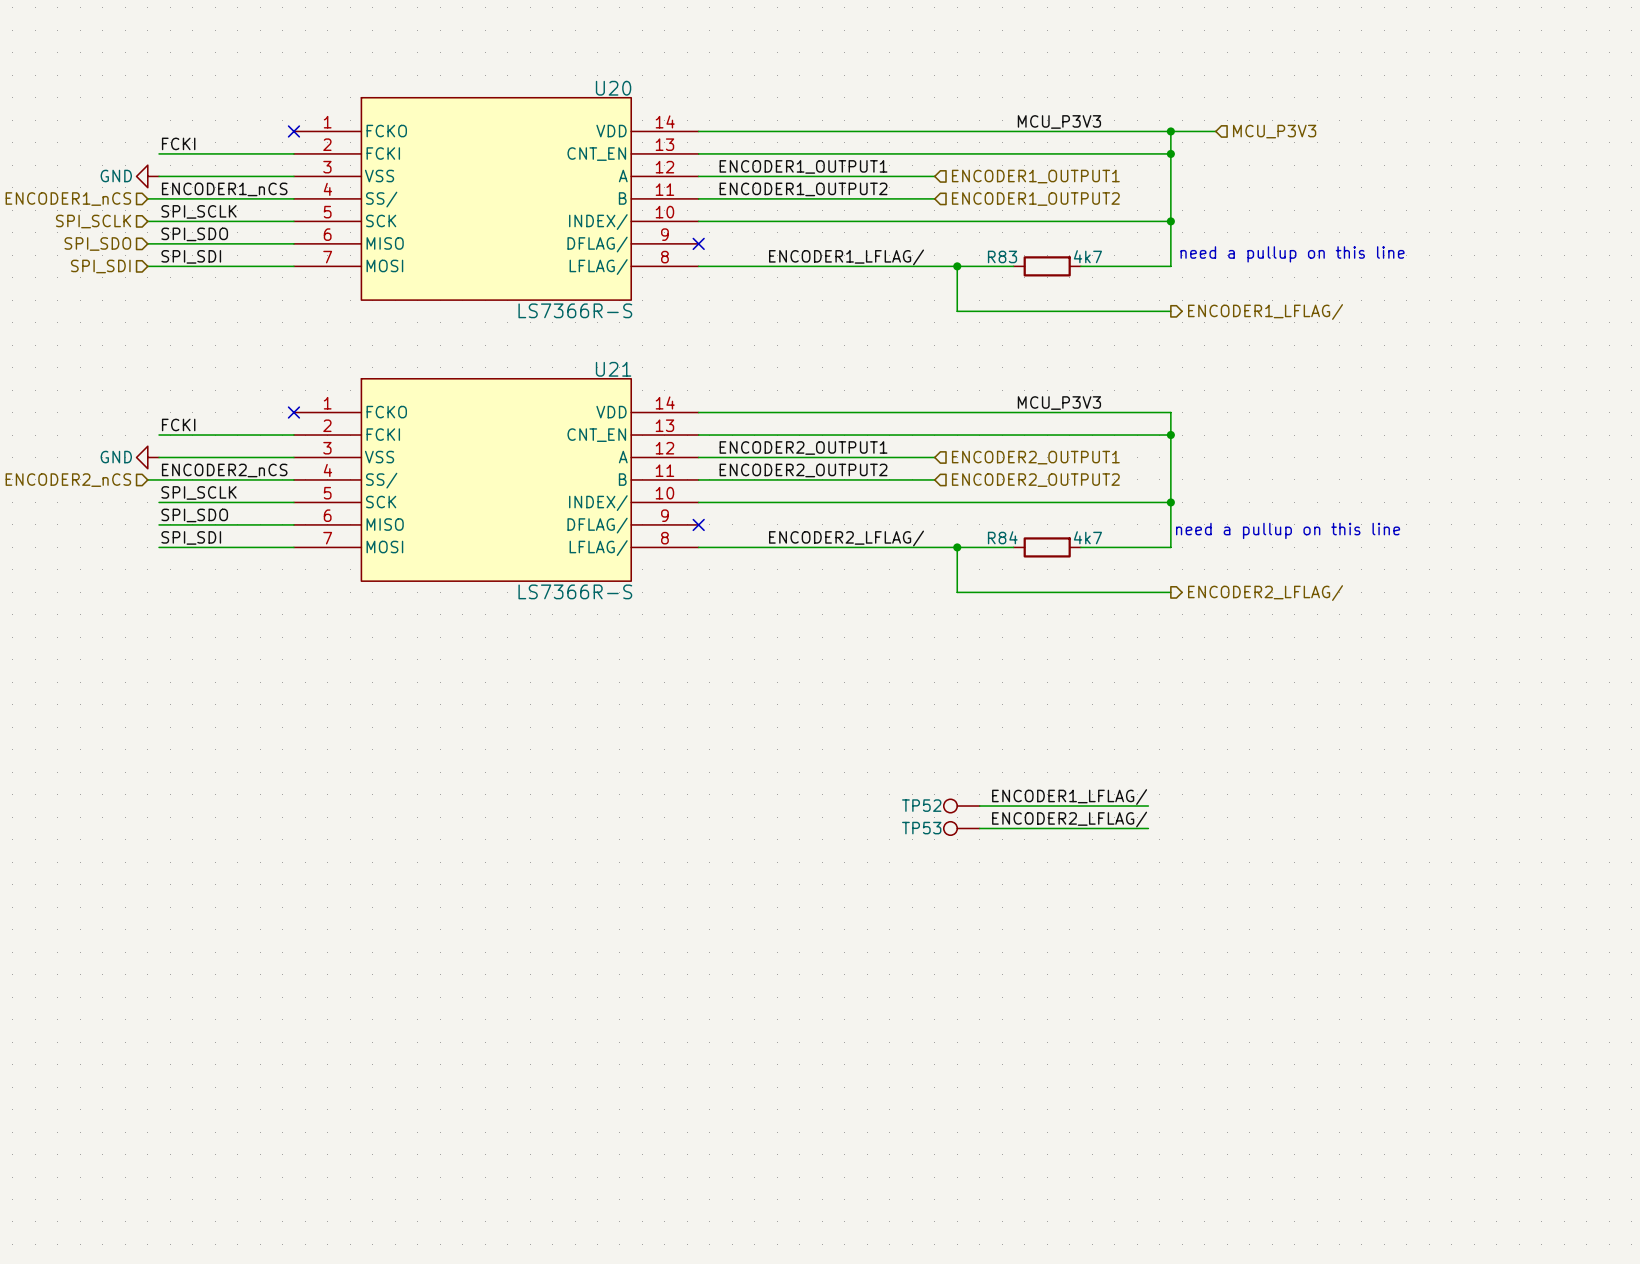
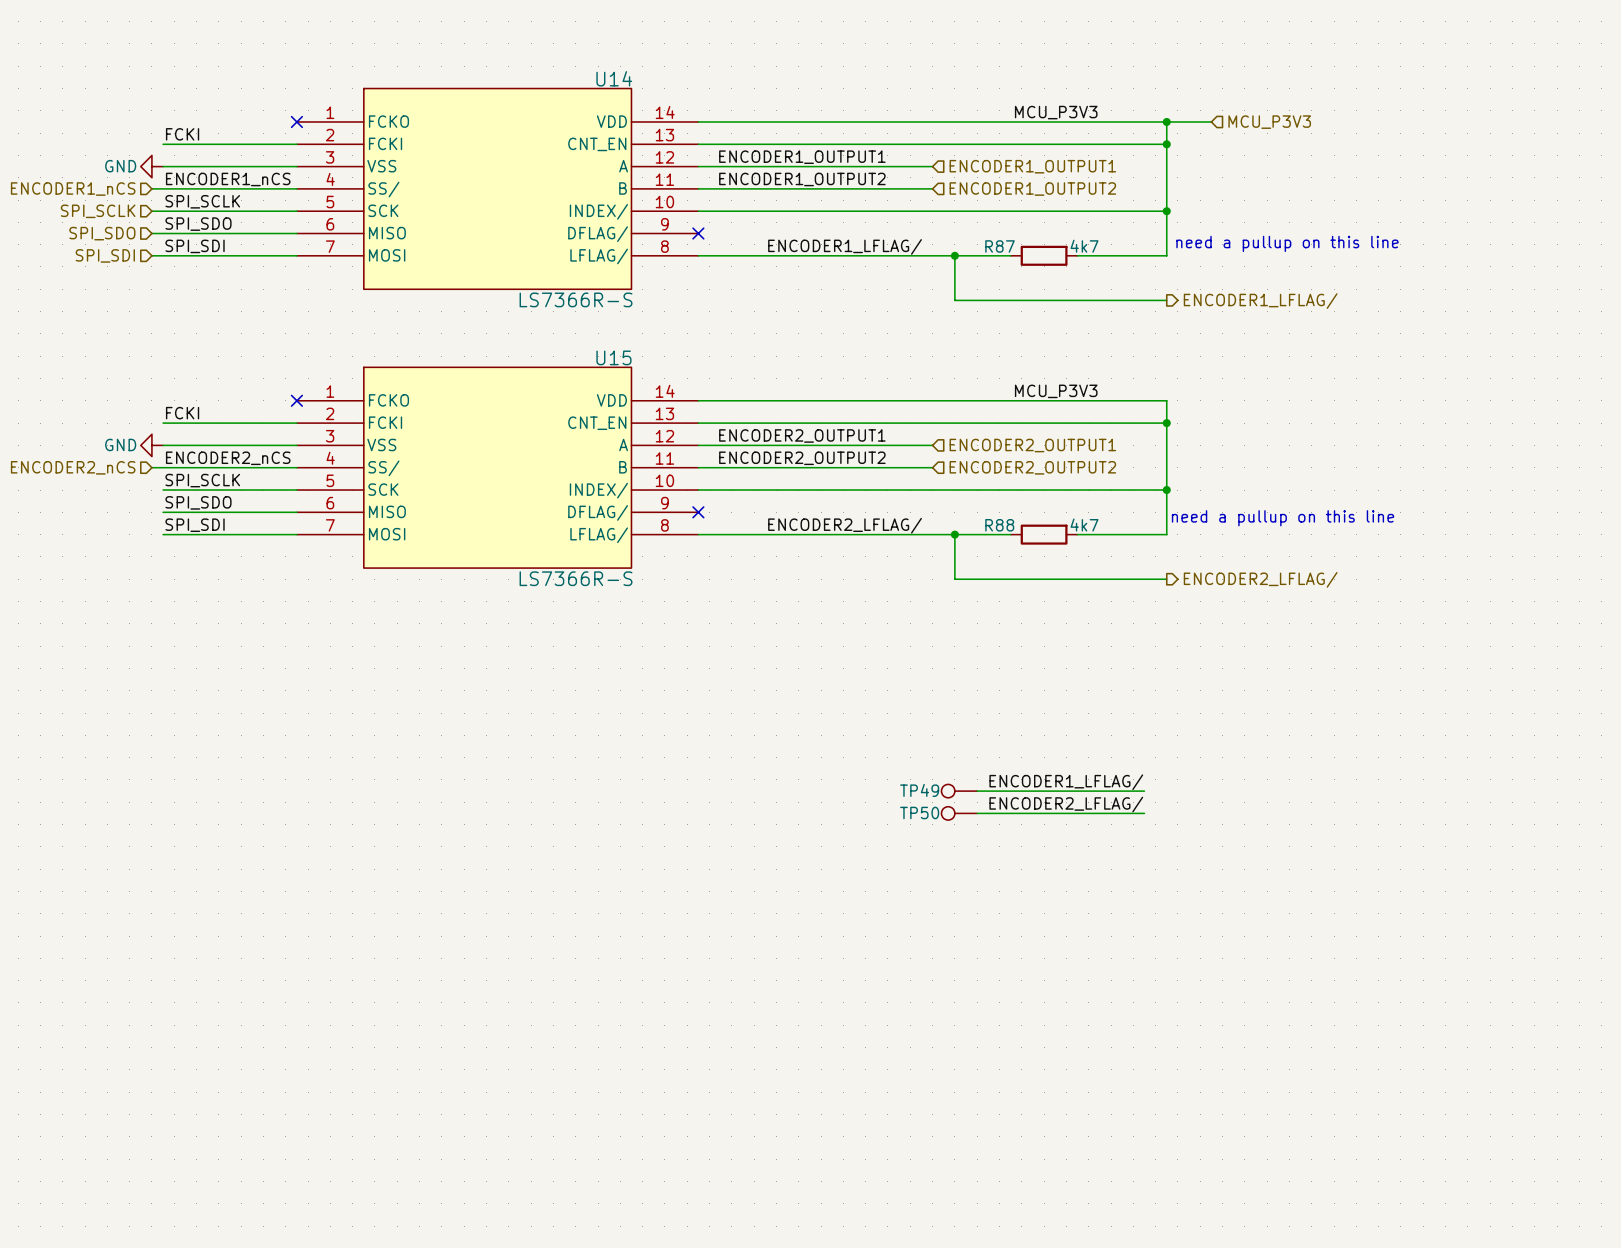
U20 name: U20 (613, 88) -> U14 (614, 78)
R83 name: R83 (1002, 256) -> R87 (1000, 246)
U21 name: U21 (613, 369) -> U15 (613, 357)
R84 name: R84 (1002, 537) -> R88 (999, 525)
TP52 name: TP52 (921, 805) -> TP49 (919, 790)
TP53 name: TP53 (921, 828) -> TP50 (919, 812)

